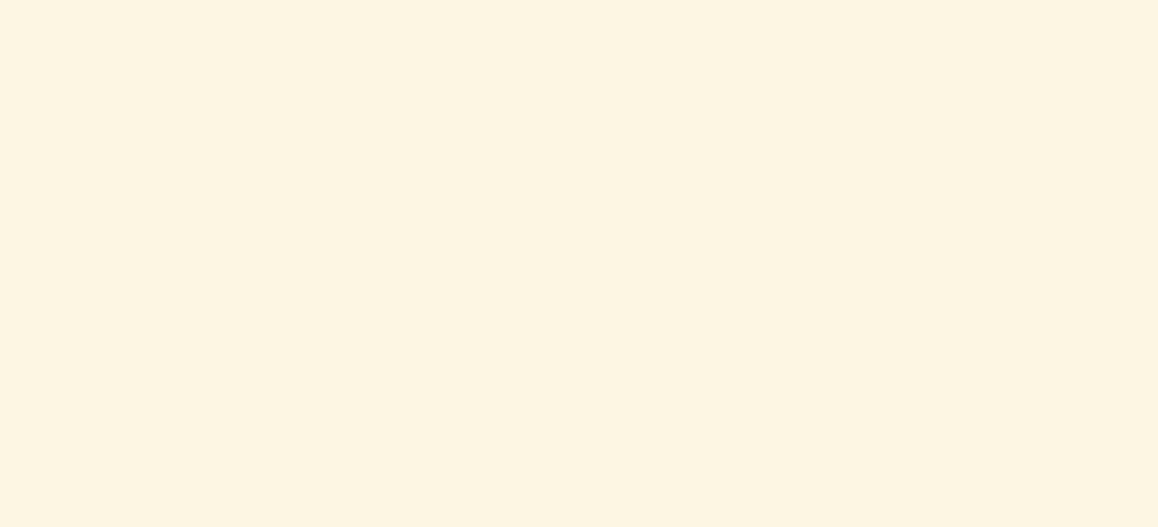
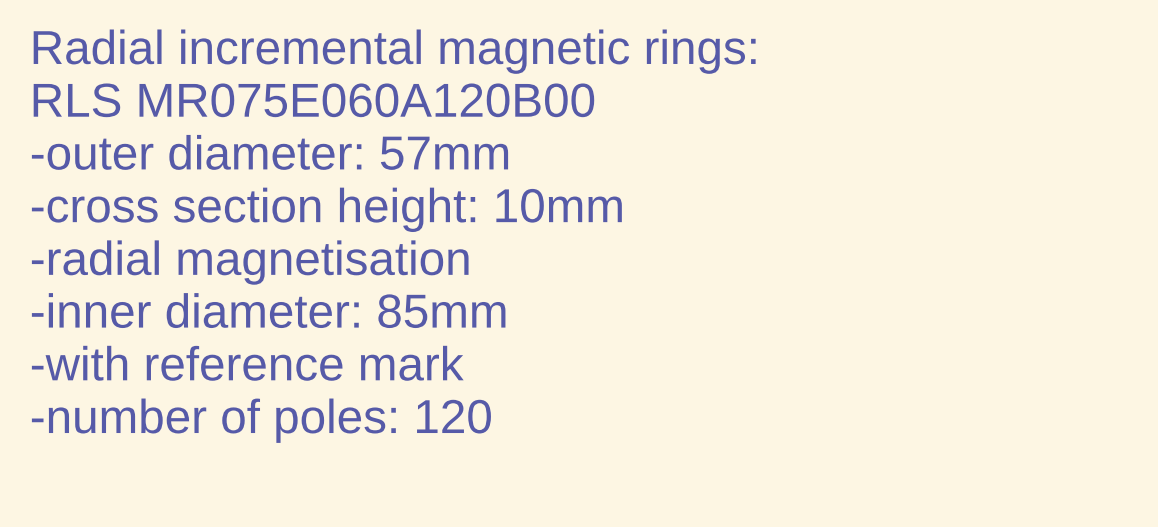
text: none -> Radial incremental magnetic rings: (394, 51)
text: none -> RLS MR075E060A120B00 (313, 100)
text: none -> -outer diameter: 57mm (269, 152)
text: none -> -cross section height: 10mm (326, 209)
text: none -> -radial magnetisation (250, 262)
text: none -> -inner diameter: 85mm (268, 310)
text: none -> -with reference mark (247, 363)
text: none -> -number of poles: 120 (261, 420)

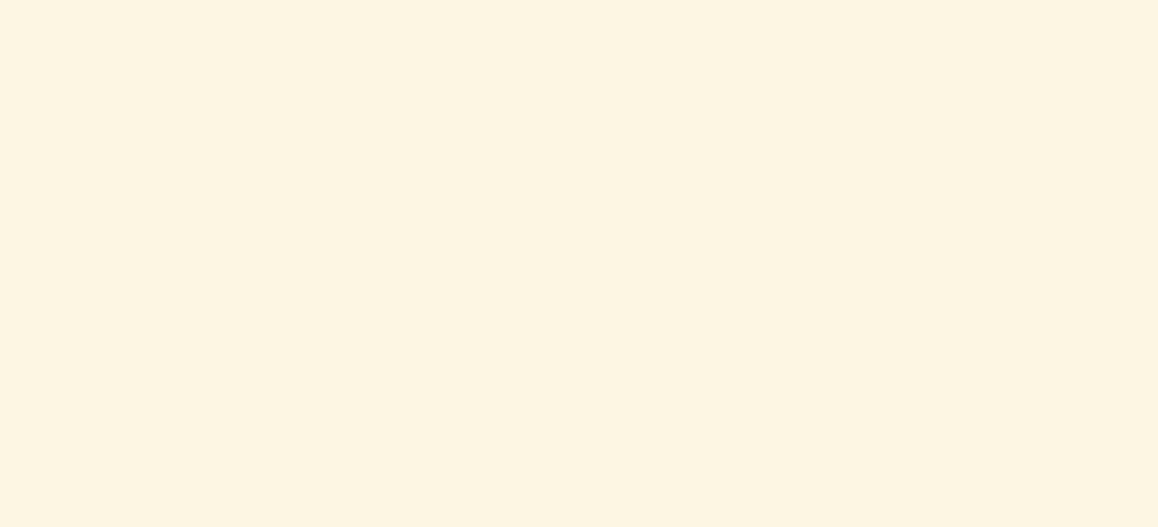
text: Radial incremental magnetic rings: (394, 51) -> none
text: RLS MR075E060A120B00 (313, 100) -> none
text: -outer diameter: 57mm (269, 152) -> none
text: -cross section height: 10mm (326, 209) -> none
text: -radial magnetisation (250, 262) -> none
text: -inner diameter: 85mm (268, 310) -> none
text: -with reference mark (247, 363) -> none
text: -number of poles: 120 (261, 420) -> none

